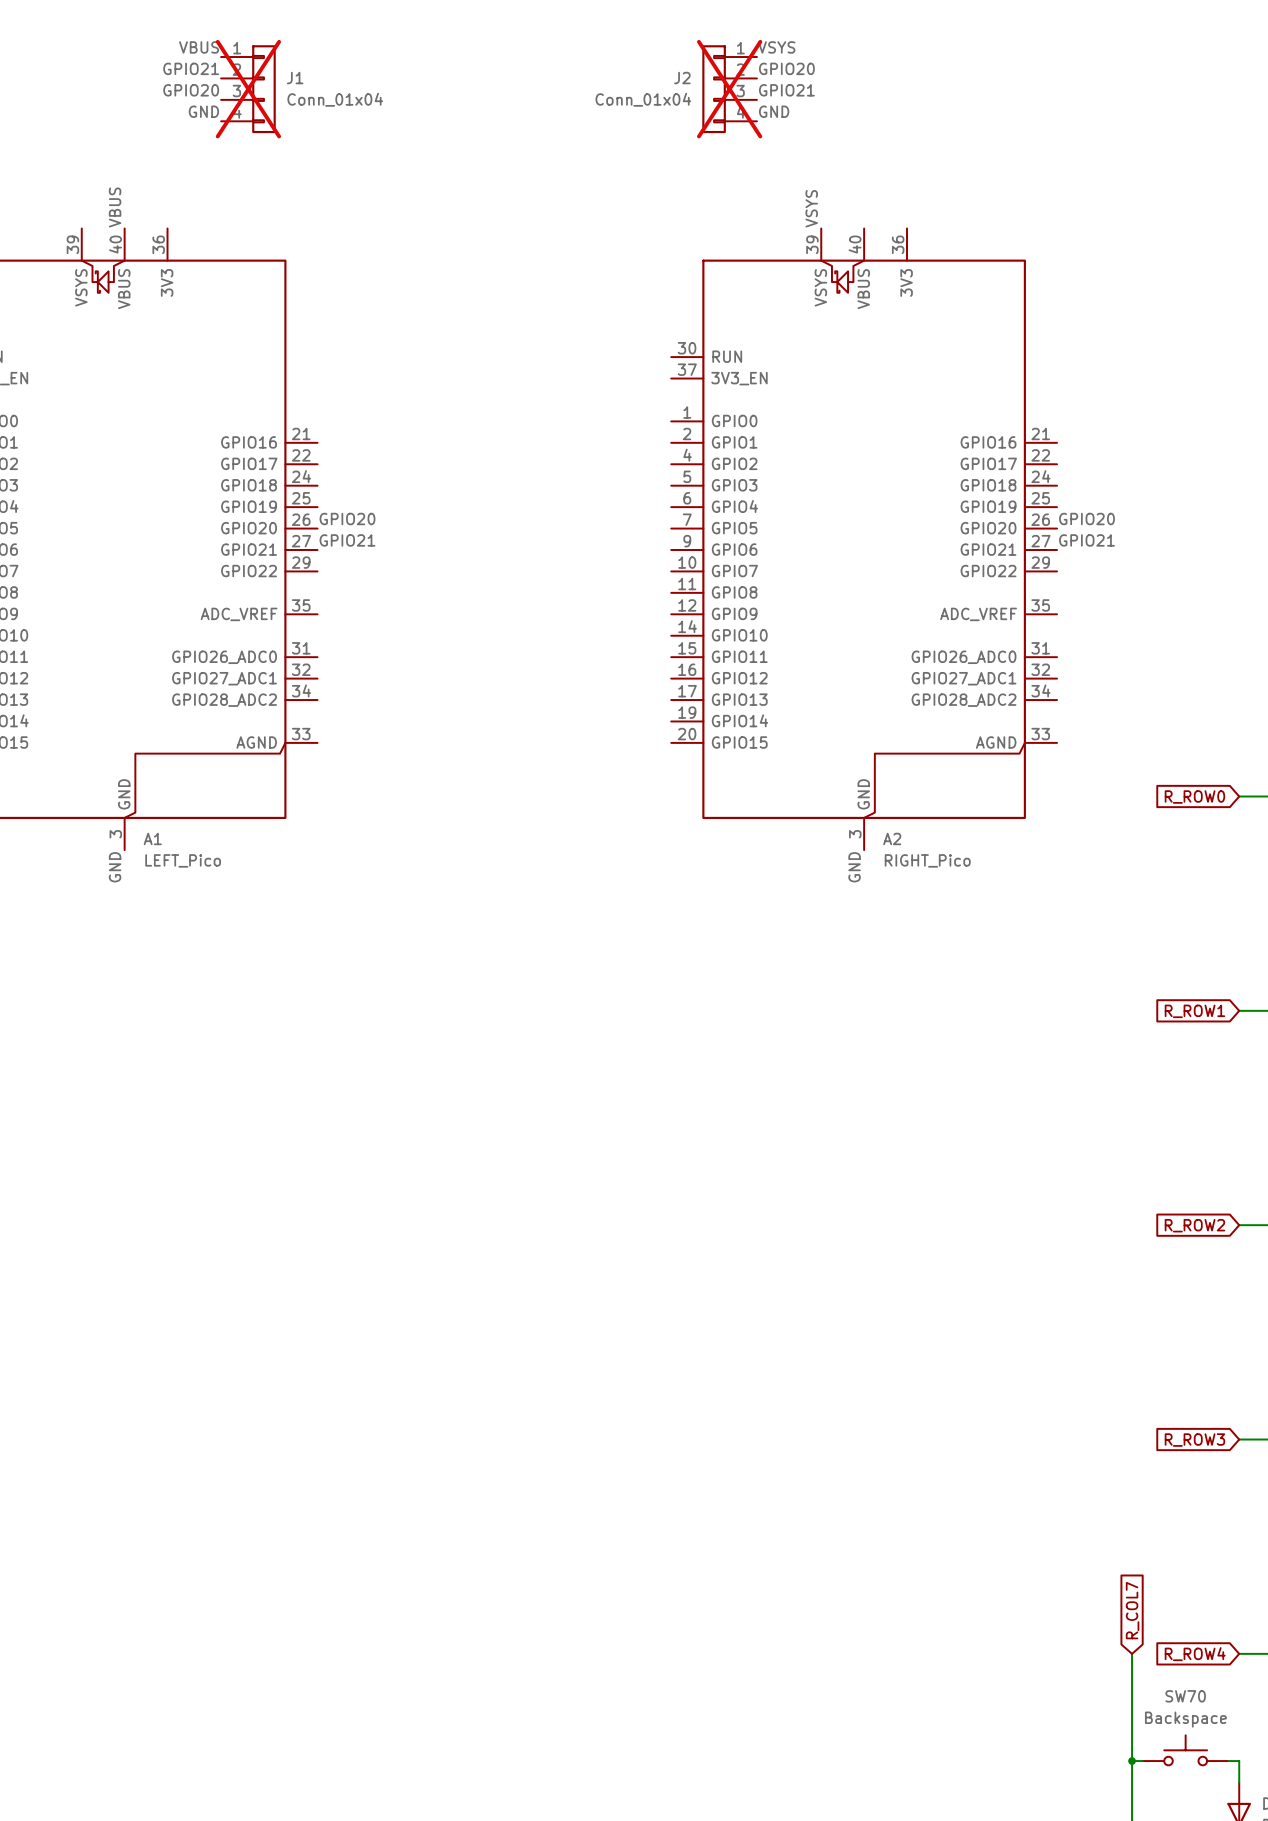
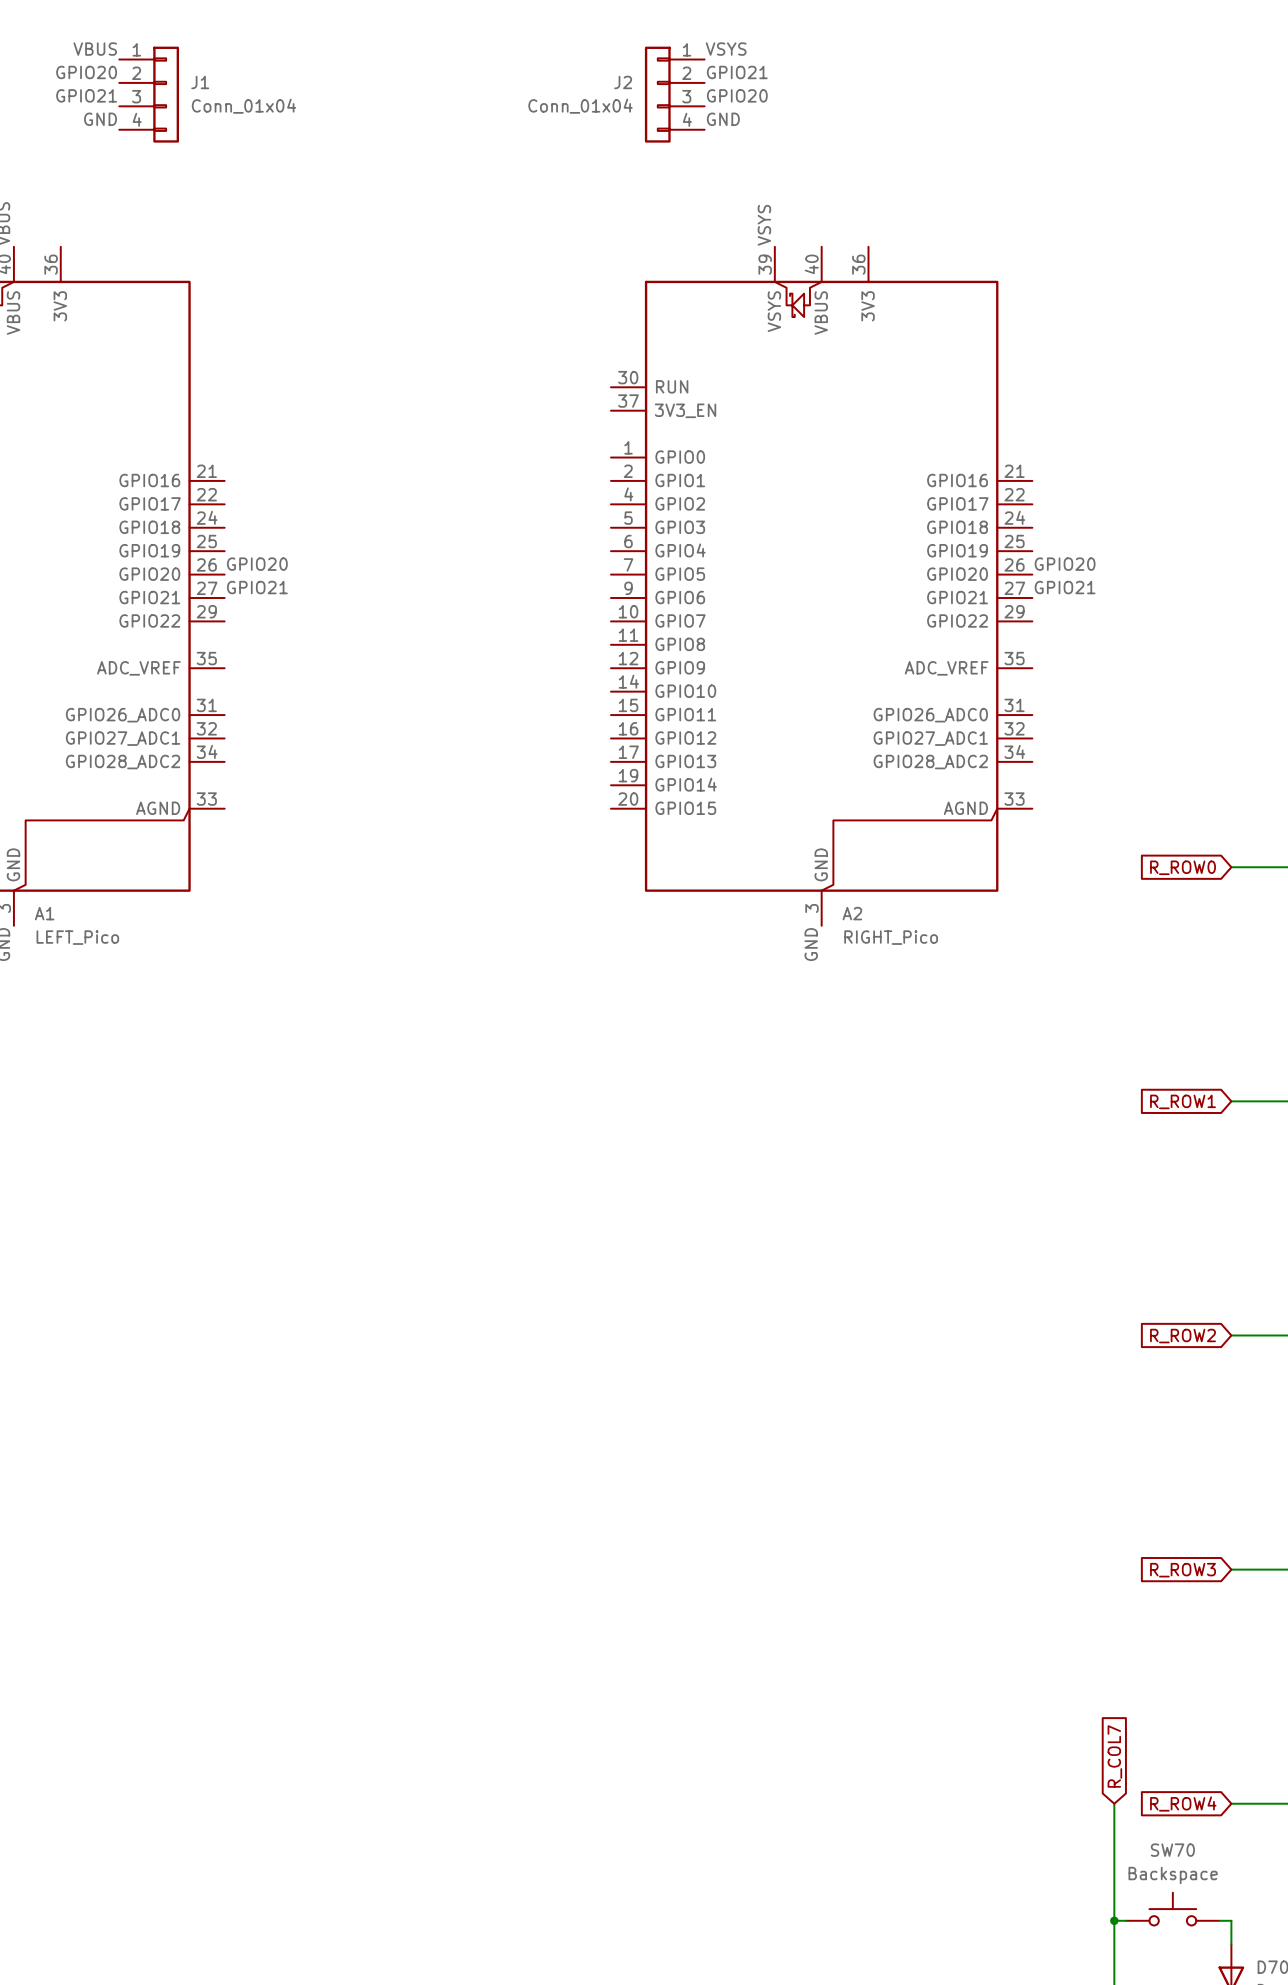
label: GPIO21 (191, 68) -> GPIO20 (86, 72)
label: GPIO20 (786, 68) -> GPIO21 (737, 72)
J1 do-not-place cross: (248, 89) -> none
J2 do-not-place cross: (729, 89) -> none
label: GPIO20 (191, 90) -> GPIO21 (86, 95)
label: GPIO21 (786, 90) -> GPIO20 (737, 95)

